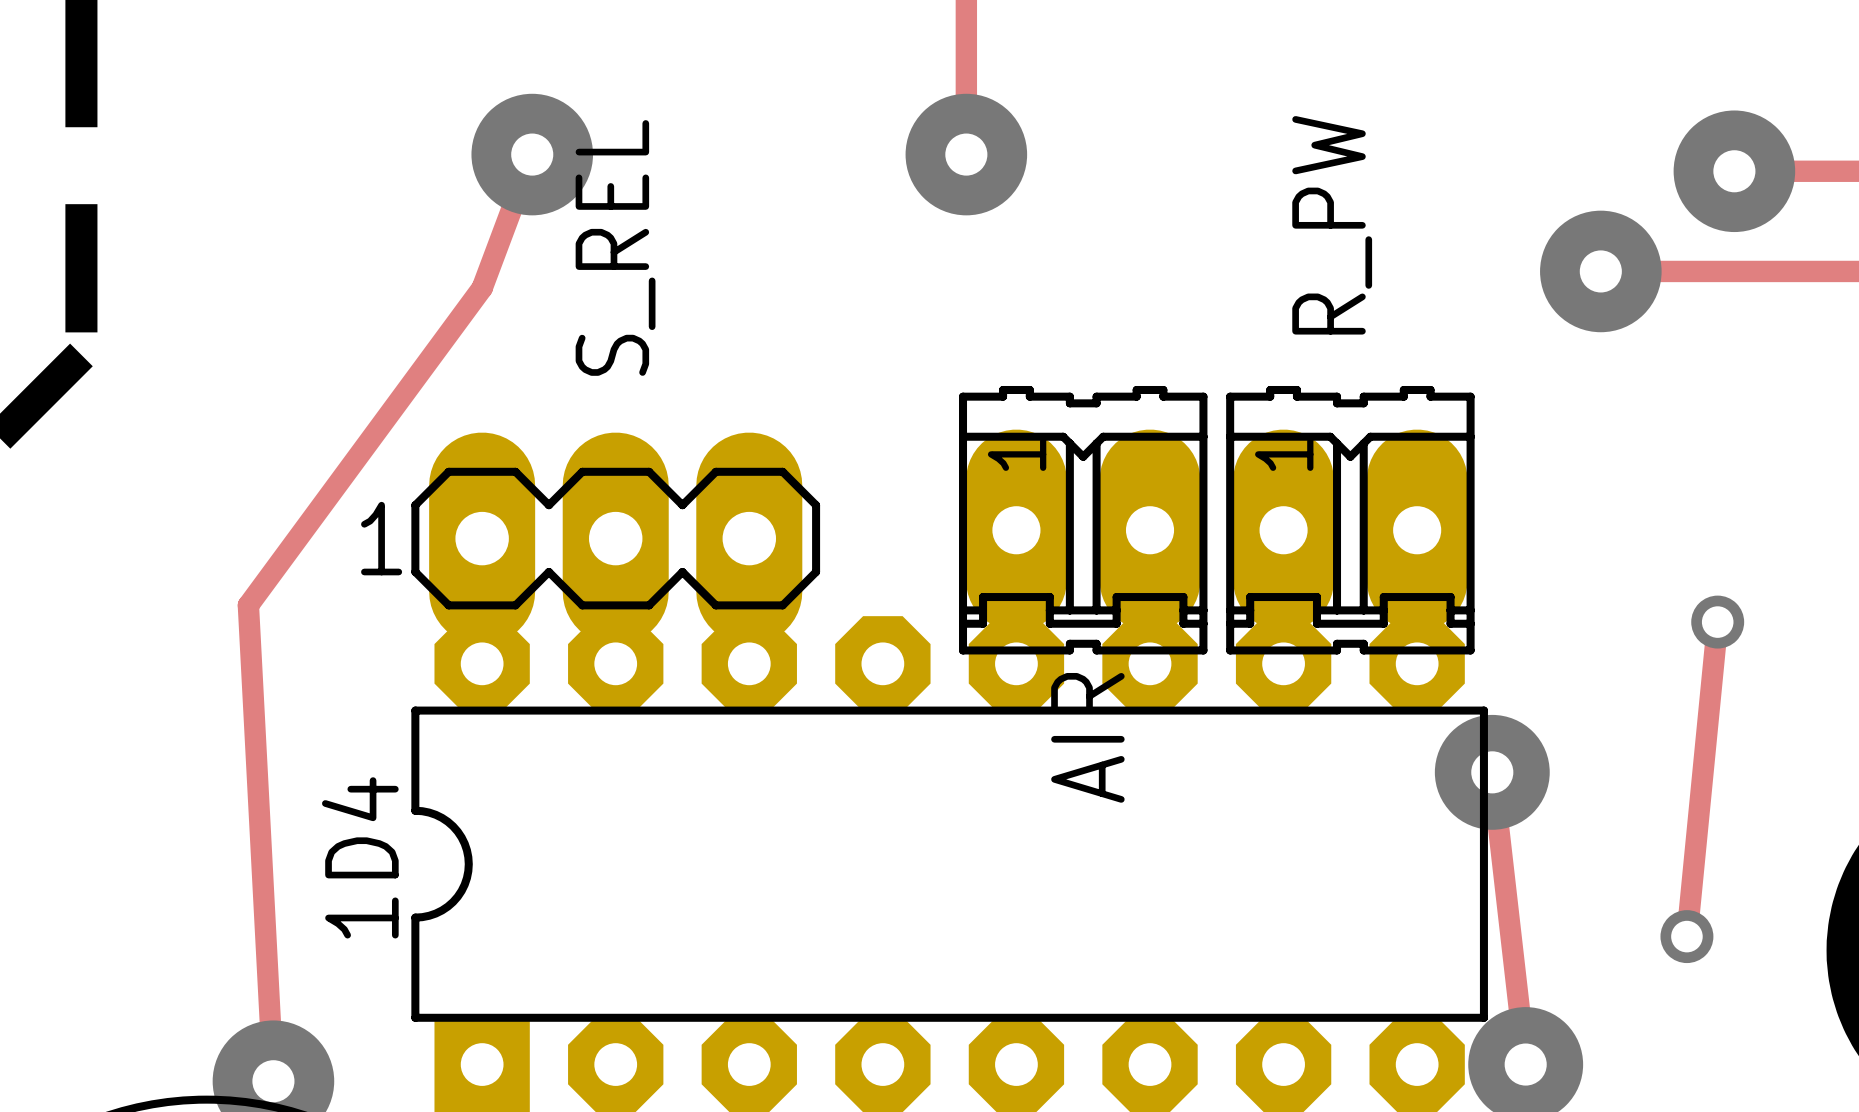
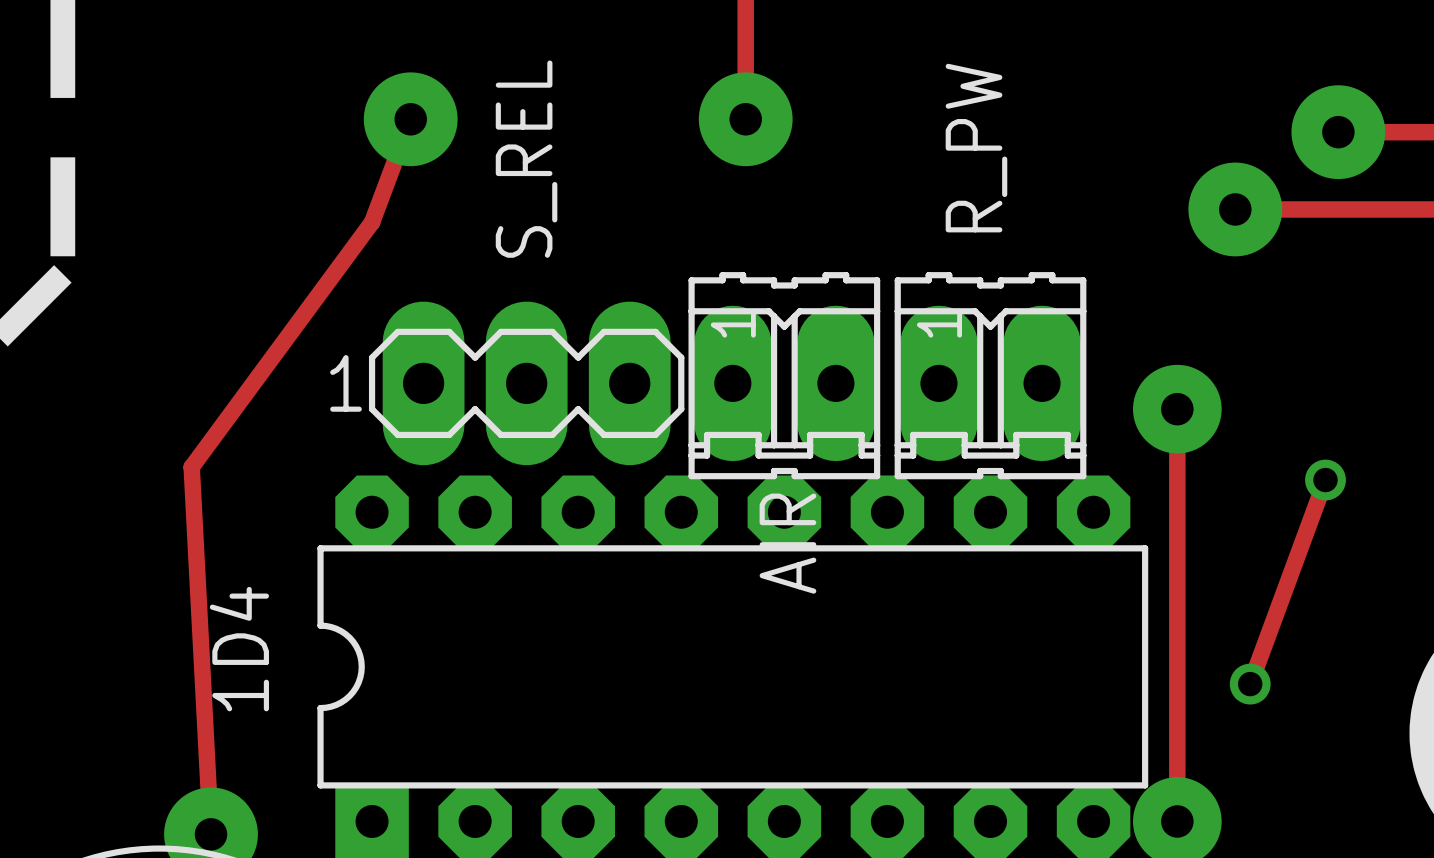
AIR position: (1083, 520) -> (784, 375)
R_PW position: (1350, 520) -> (990, 375)
S_REL position: (615, 538) -> (526, 383)
track: (1717, 622) (1686, 936) -> (1325, 480) (1250, 684)
track: (1492, 772) (1525, 1064) -> (1177, 409) (1177, 821)
via position: (1492, 772) -> (1177, 409)
1D4 name position: 1D4 (360, 857) -> 1D4 (239, 649)
via position: (1686, 936) -> (1250, 684)

